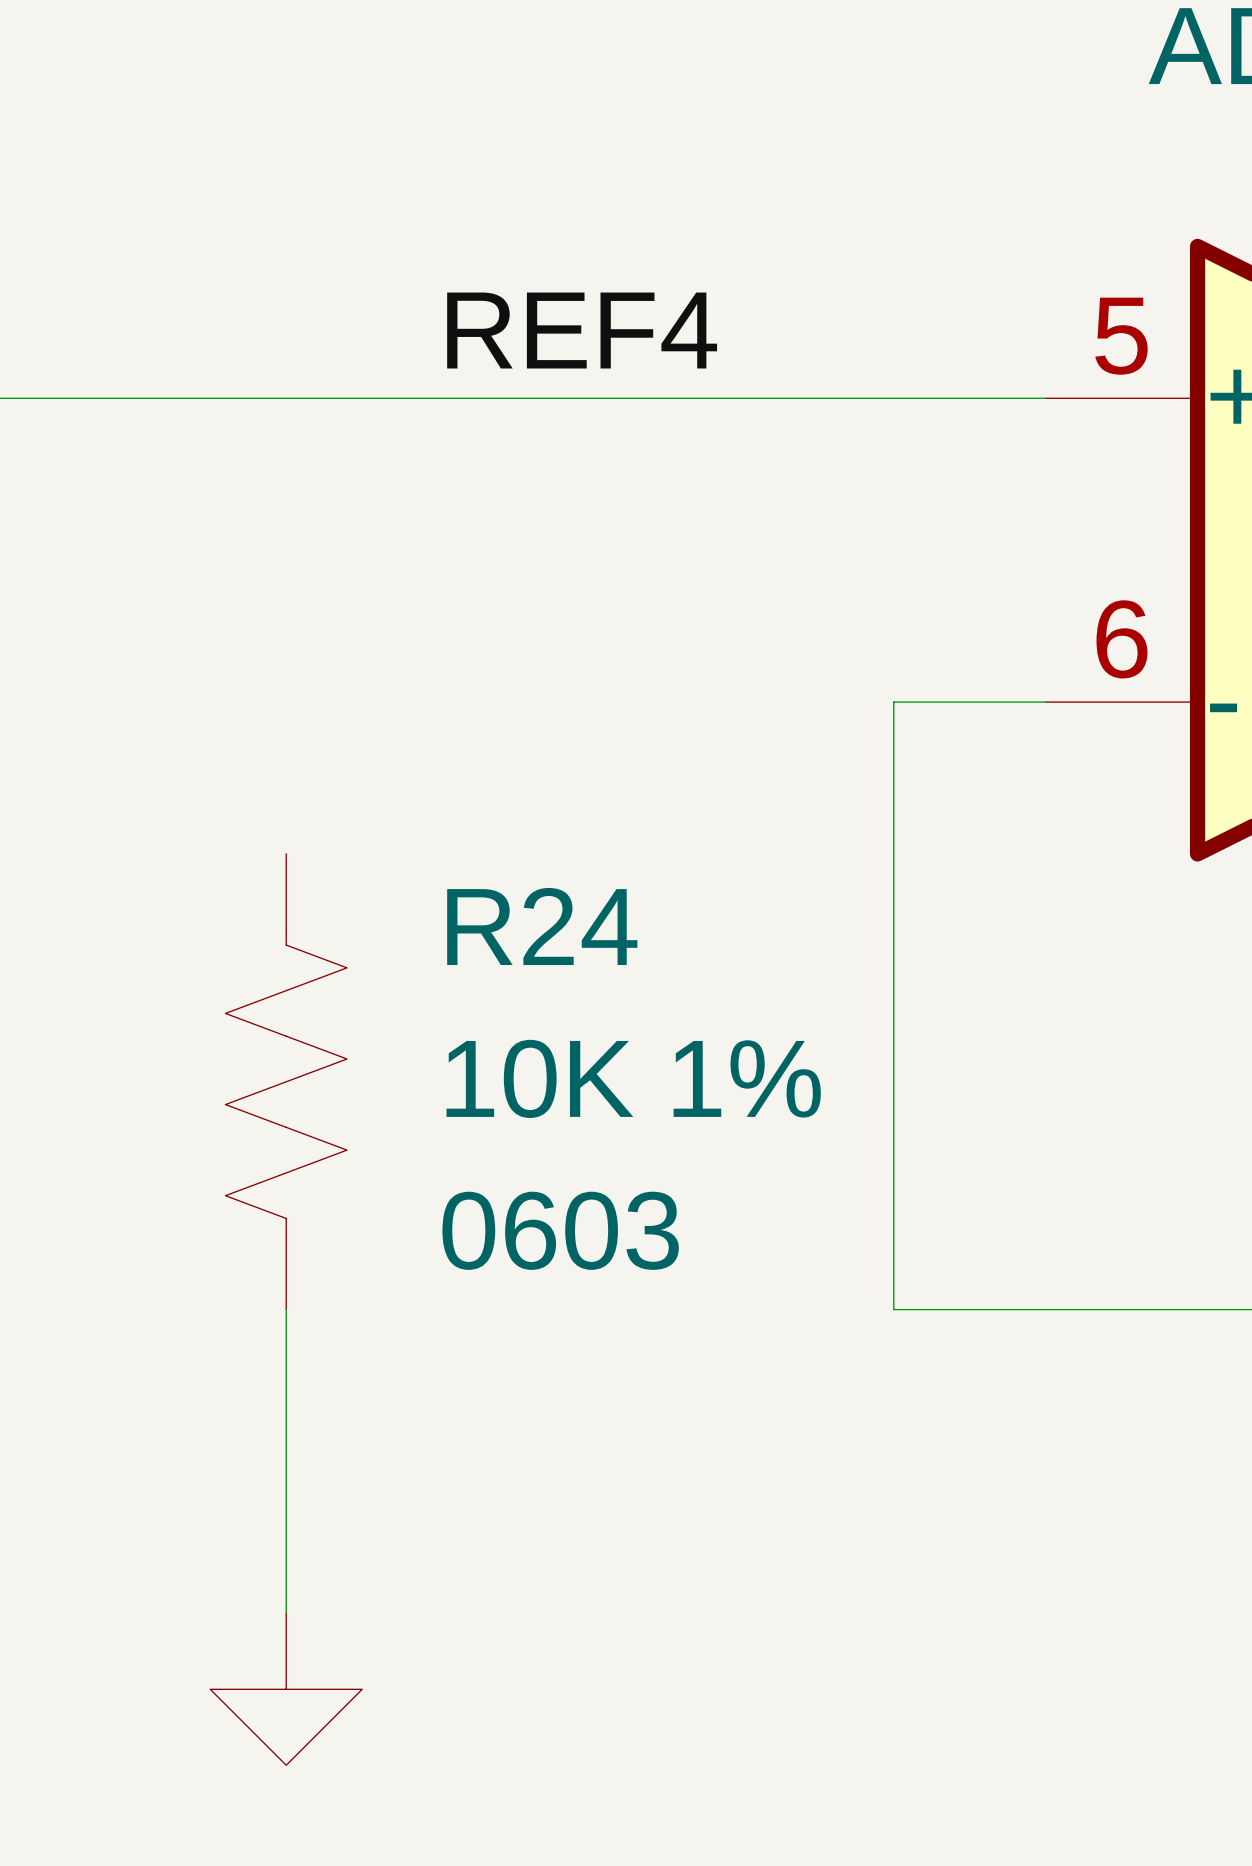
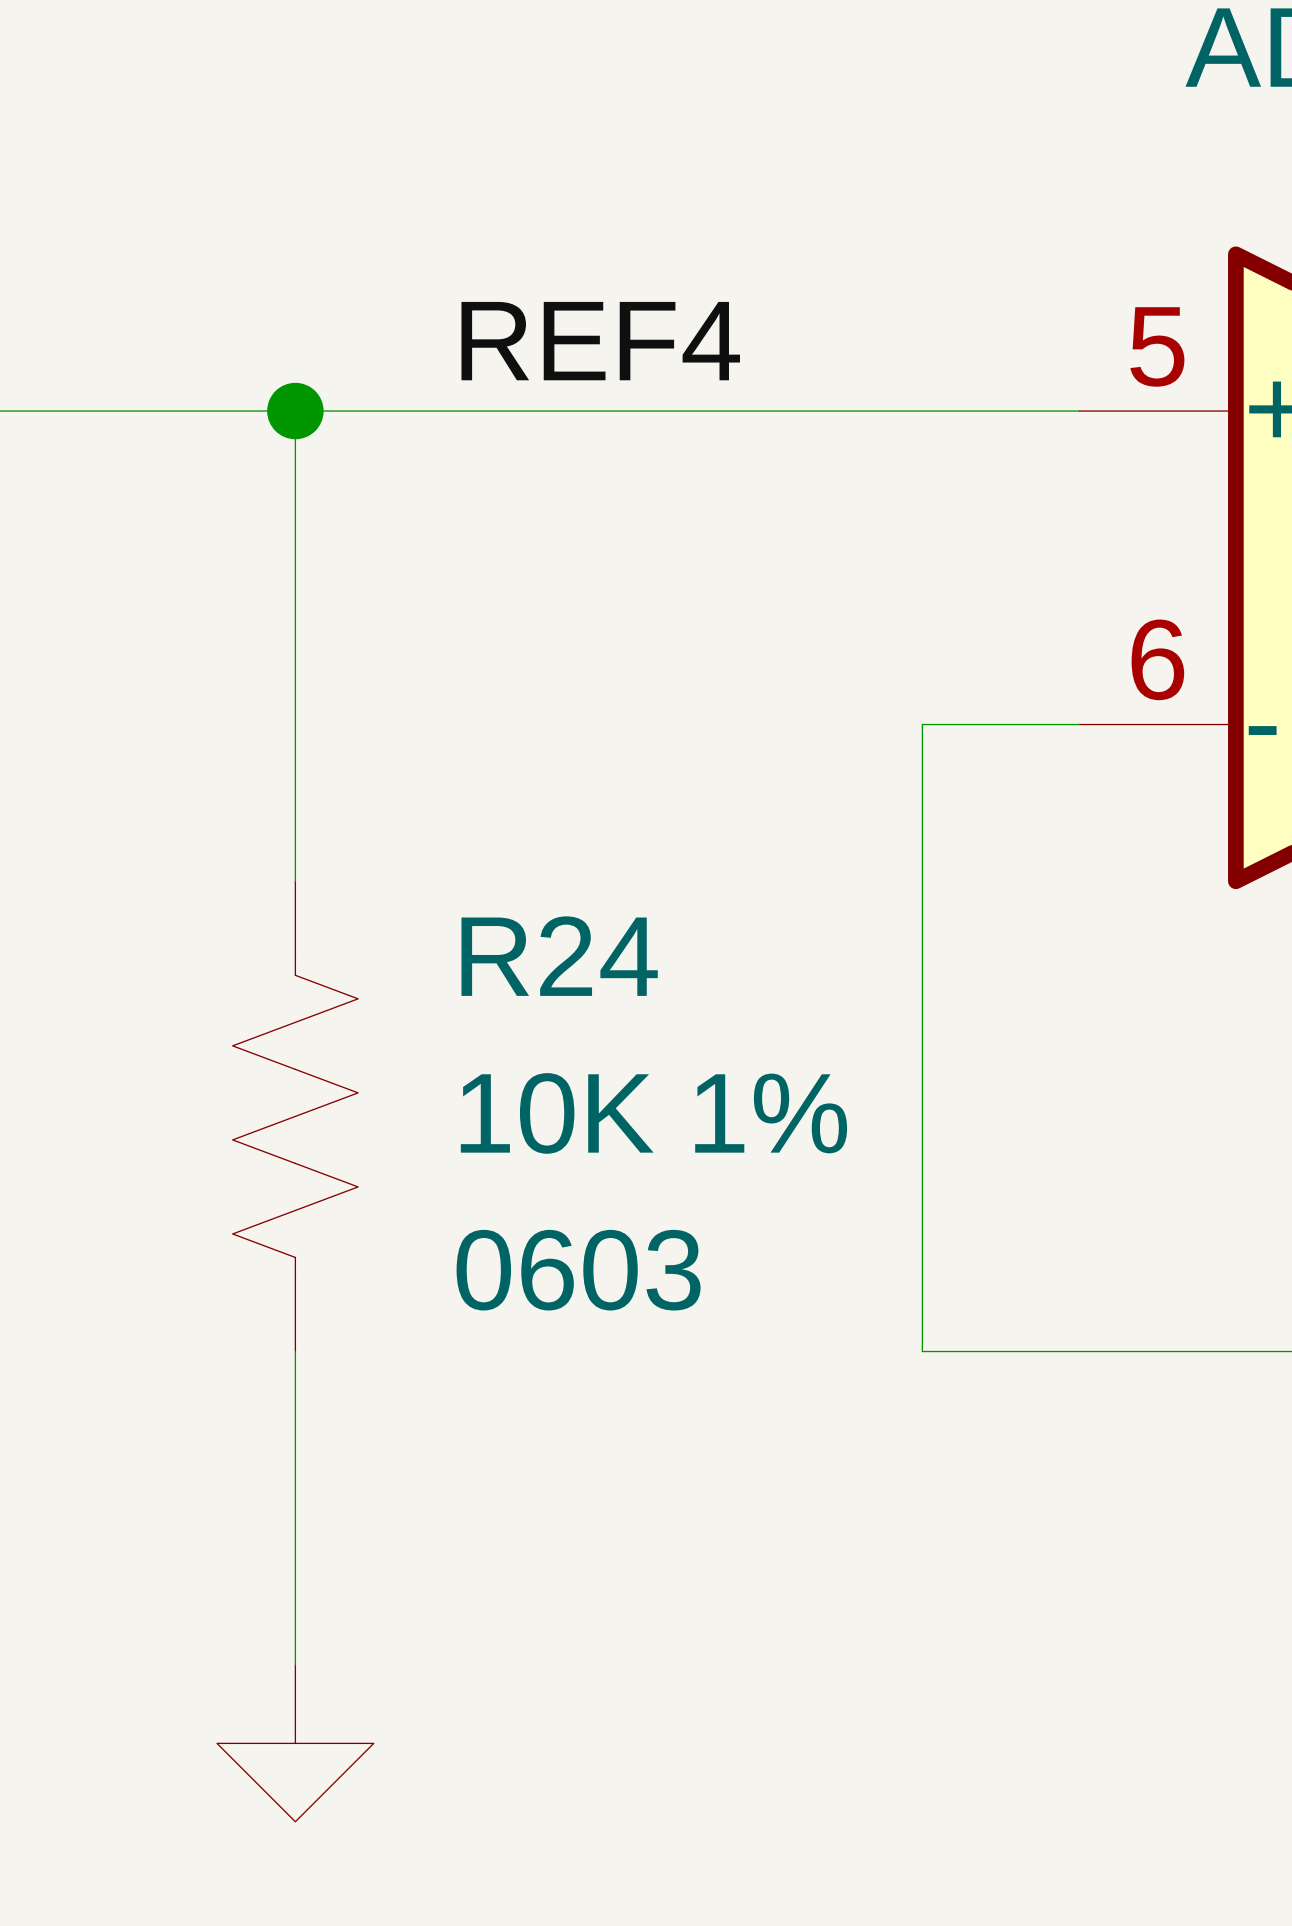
wire: none -> (295, 411) (295, 881)
junction: none -> (295, 411)

